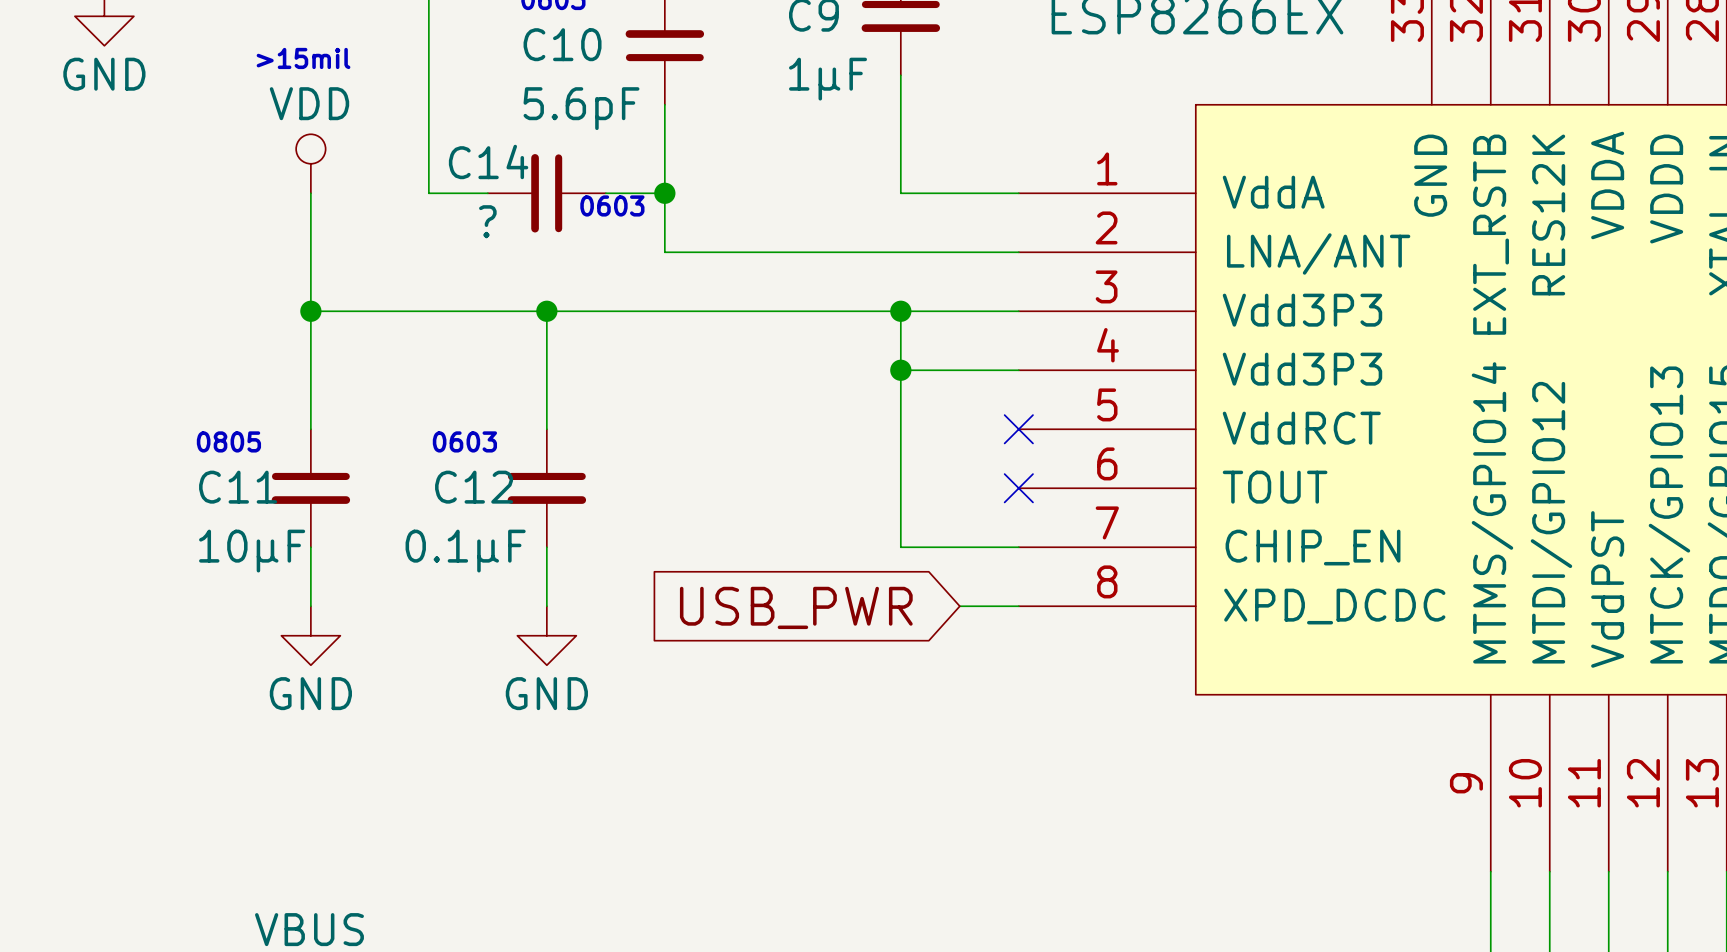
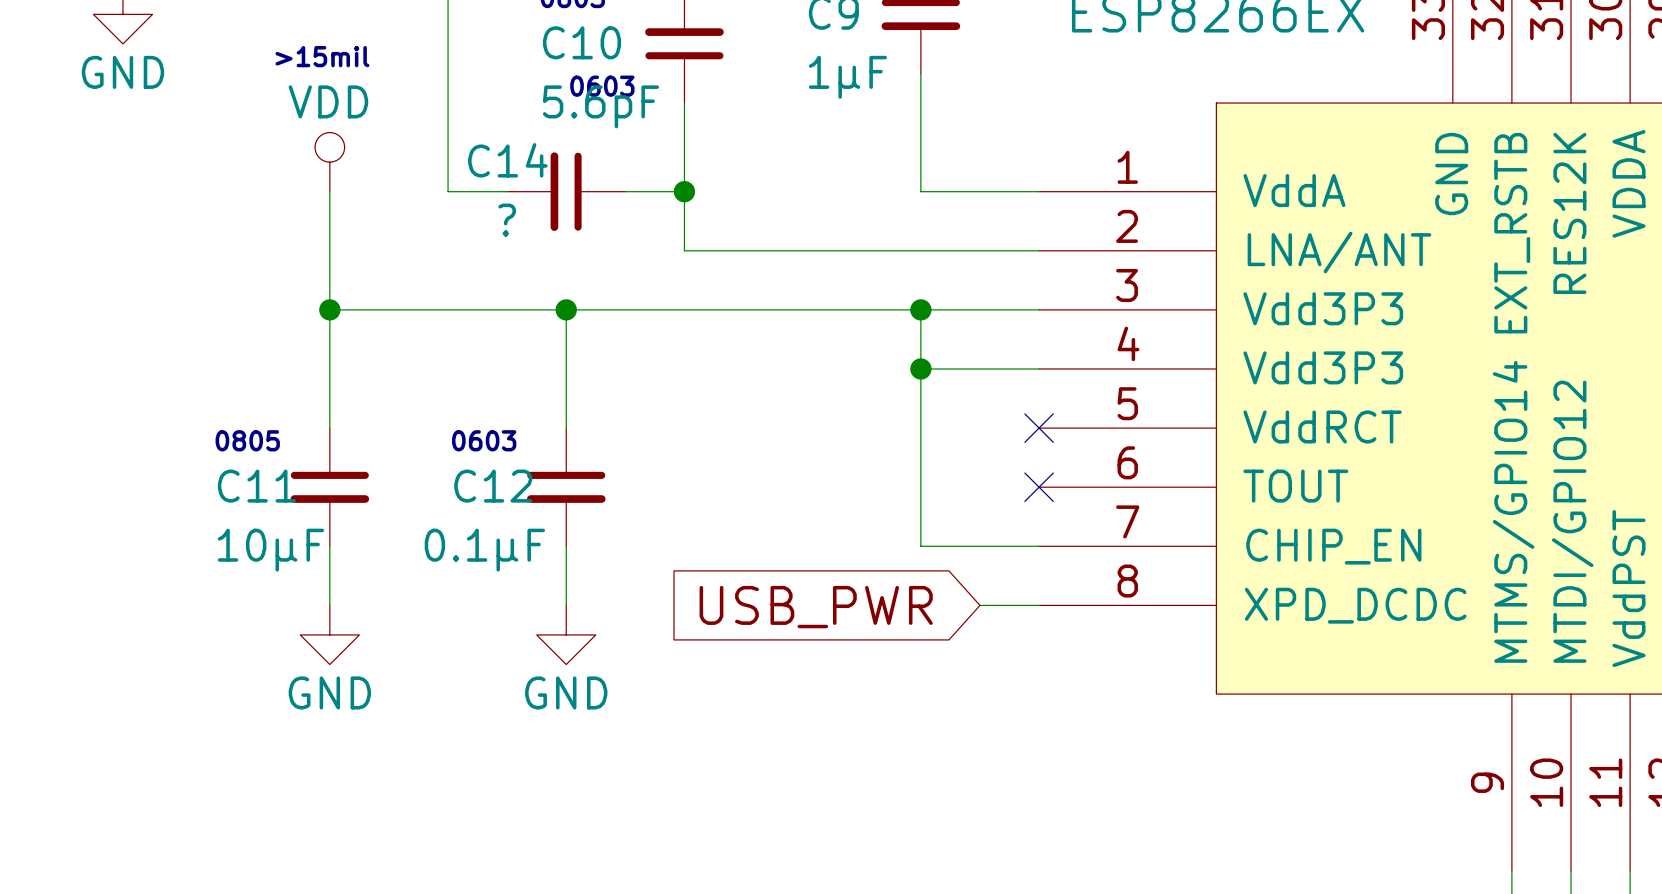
text: none -> 0603 (602, 86)
text: 0603 (612, 205) -> none

